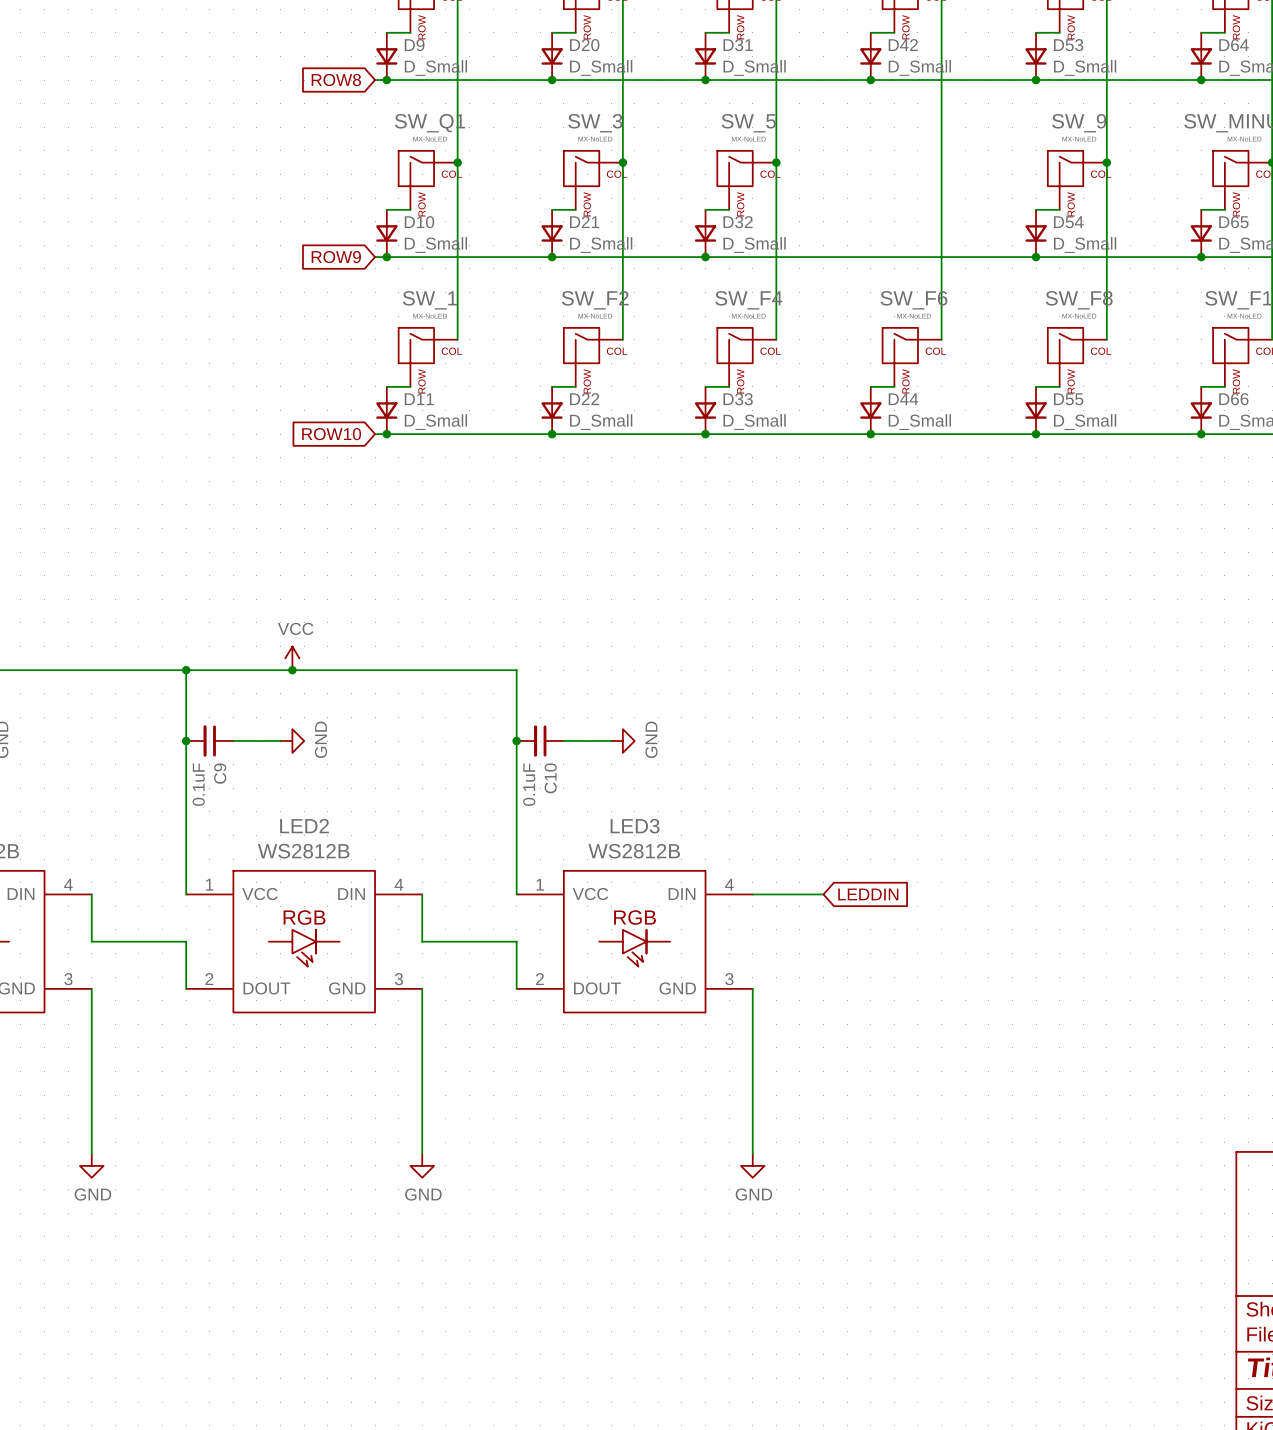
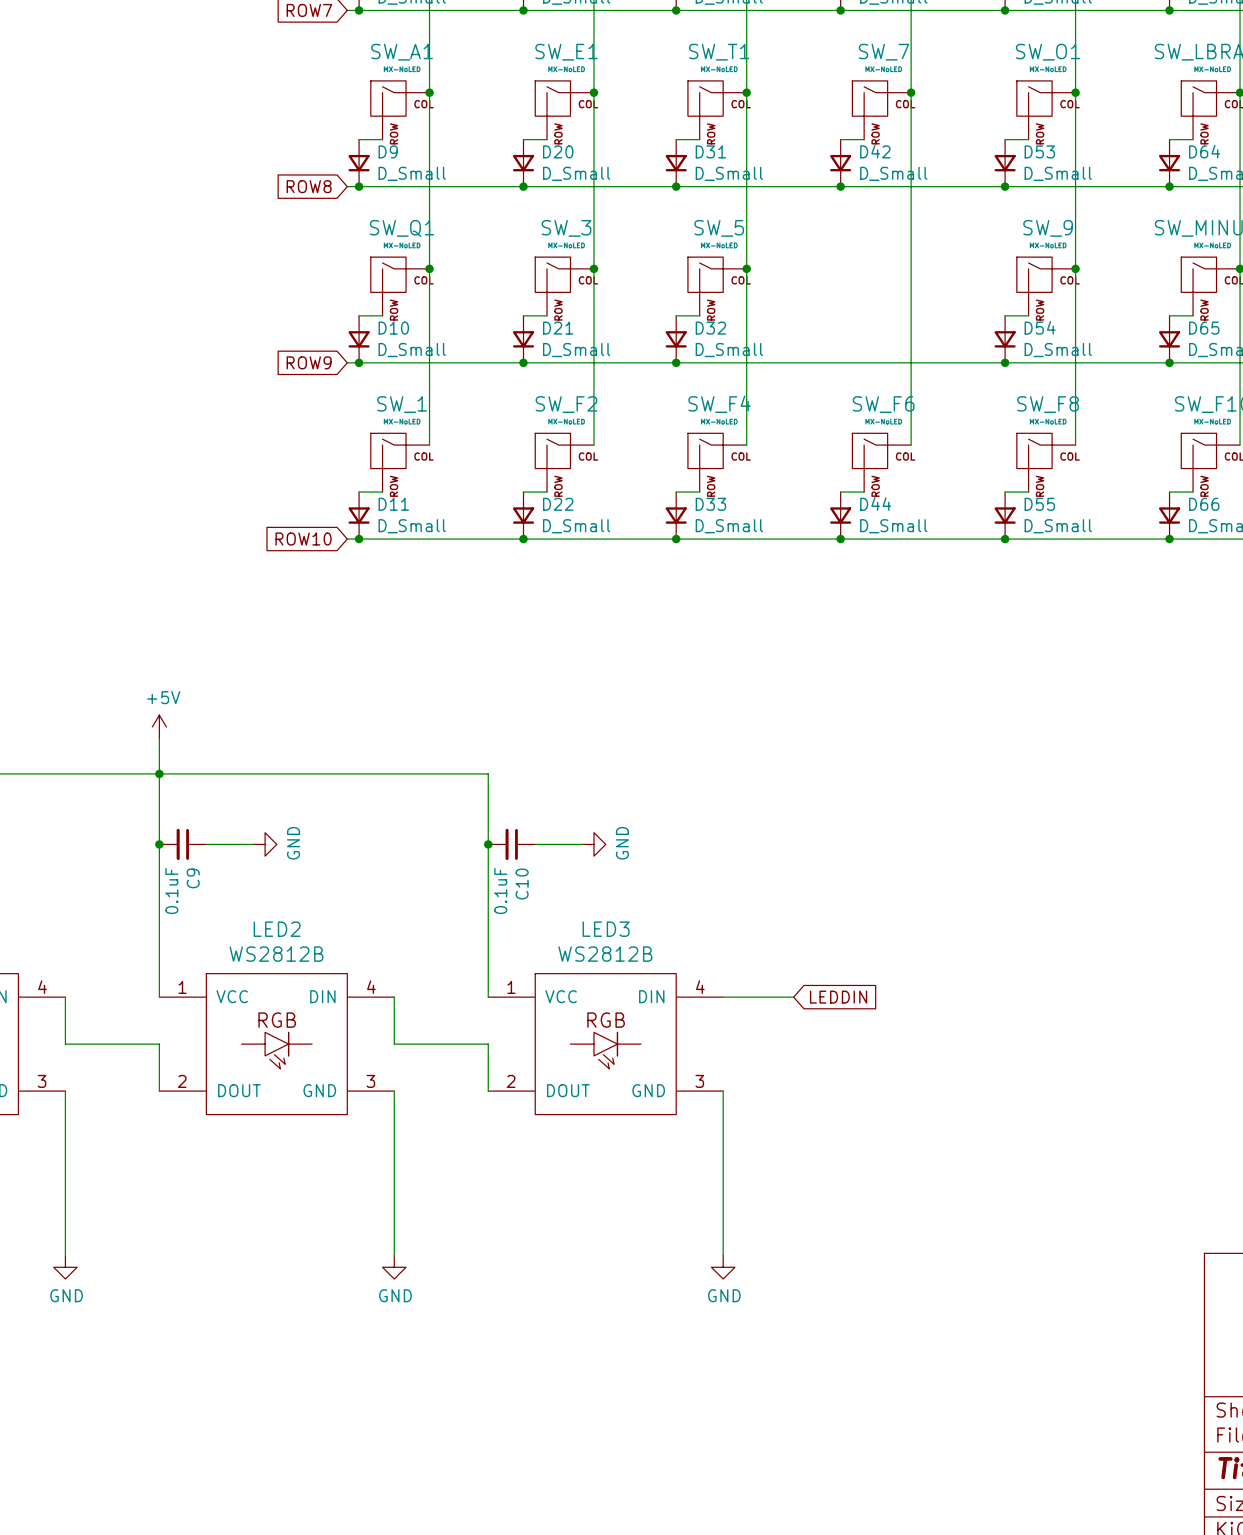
power symbol: none -> +5V (159, 726)
wire: none -> (159, 738) (159, 773)
power symbol: VCC (292, 658) -> none
junction: (292, 670) -> none

